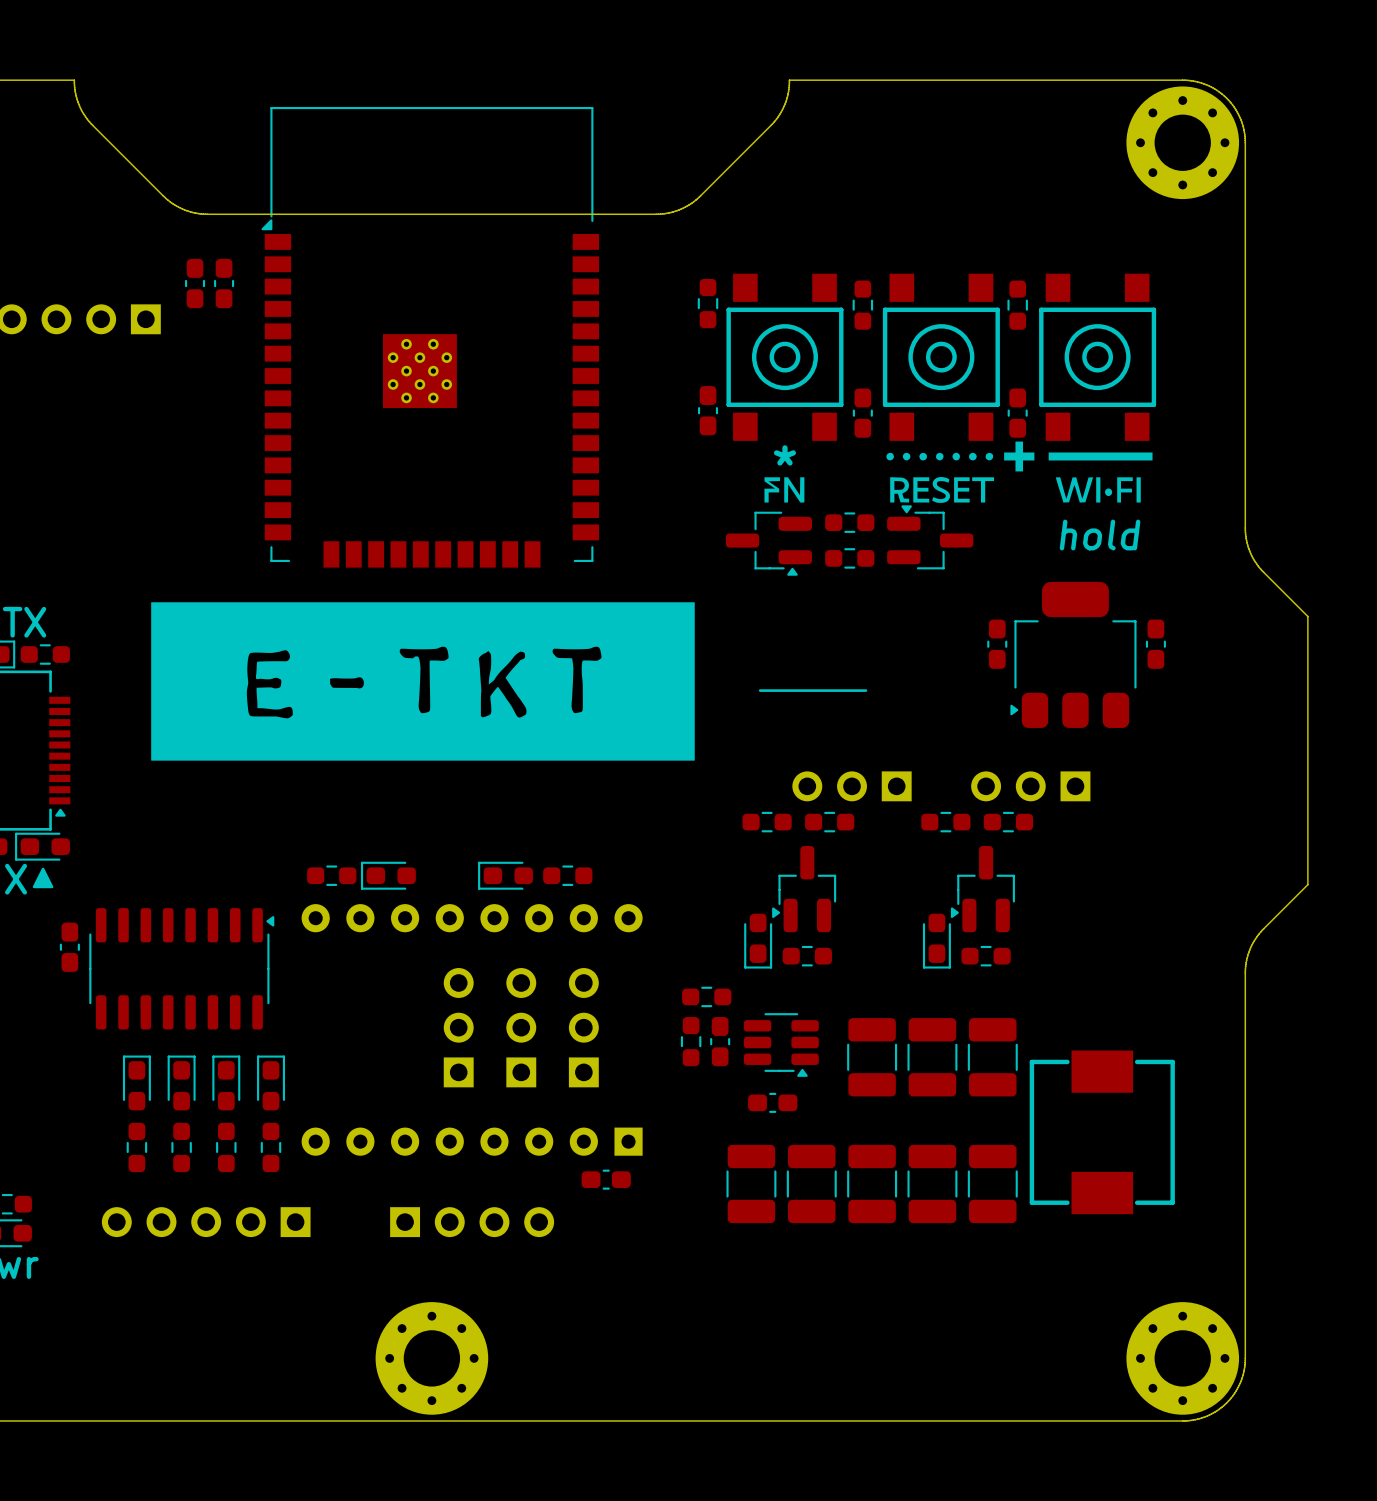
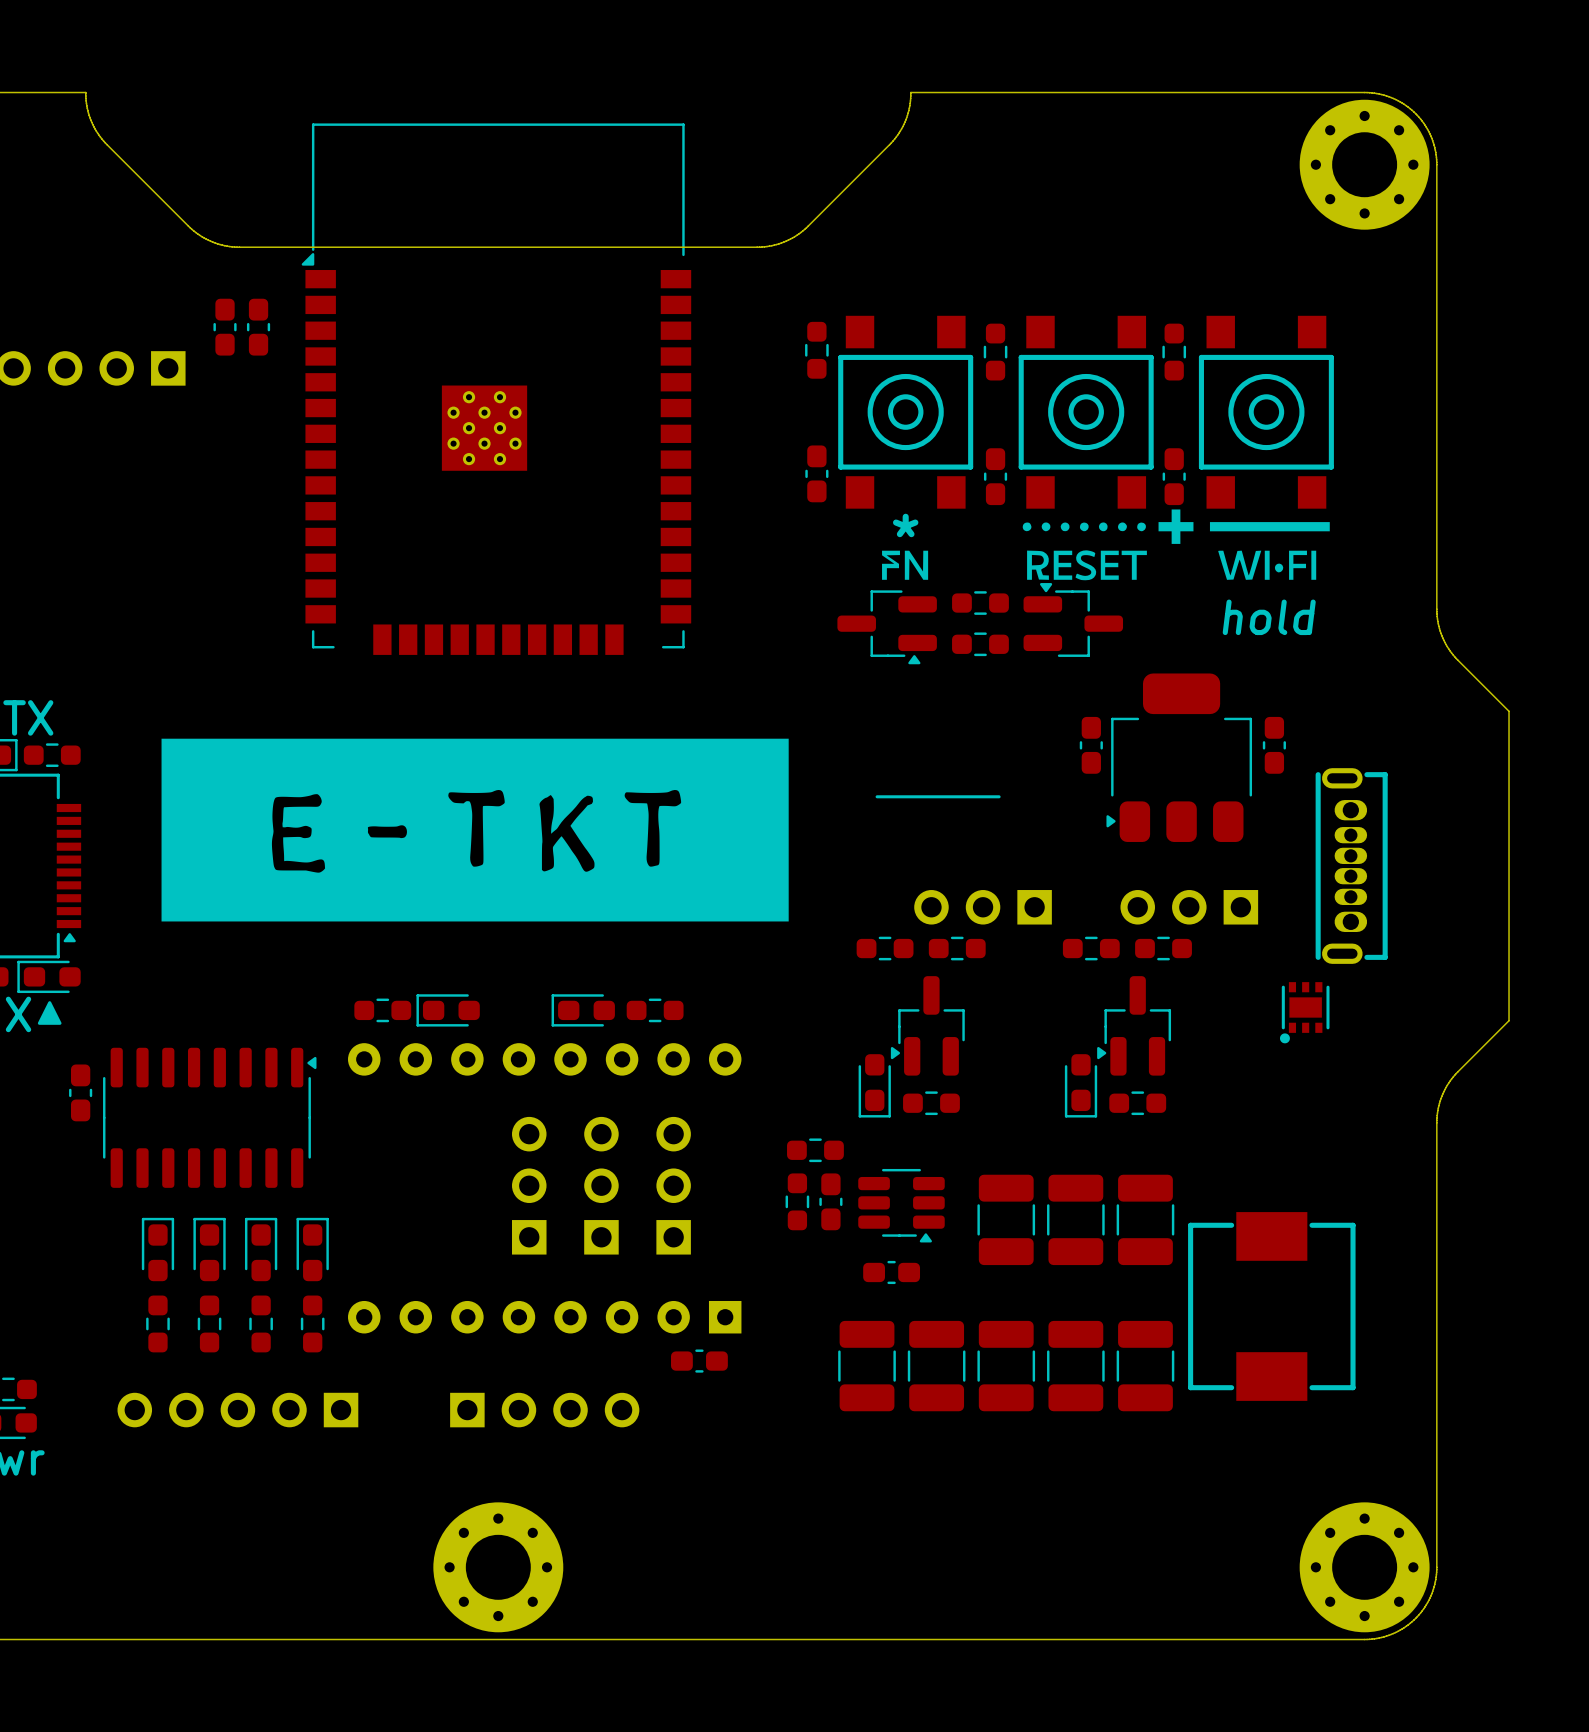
part position: (997, 644) -> (1091, 745)
part position: (1155, 644) -> (1274, 745)
part position: (1073, 654) -> (1179, 757)
drawing position: (422, 681) -> (475, 830)
part: none -> (1351, 866)
part: none -> (1304, 1012)

